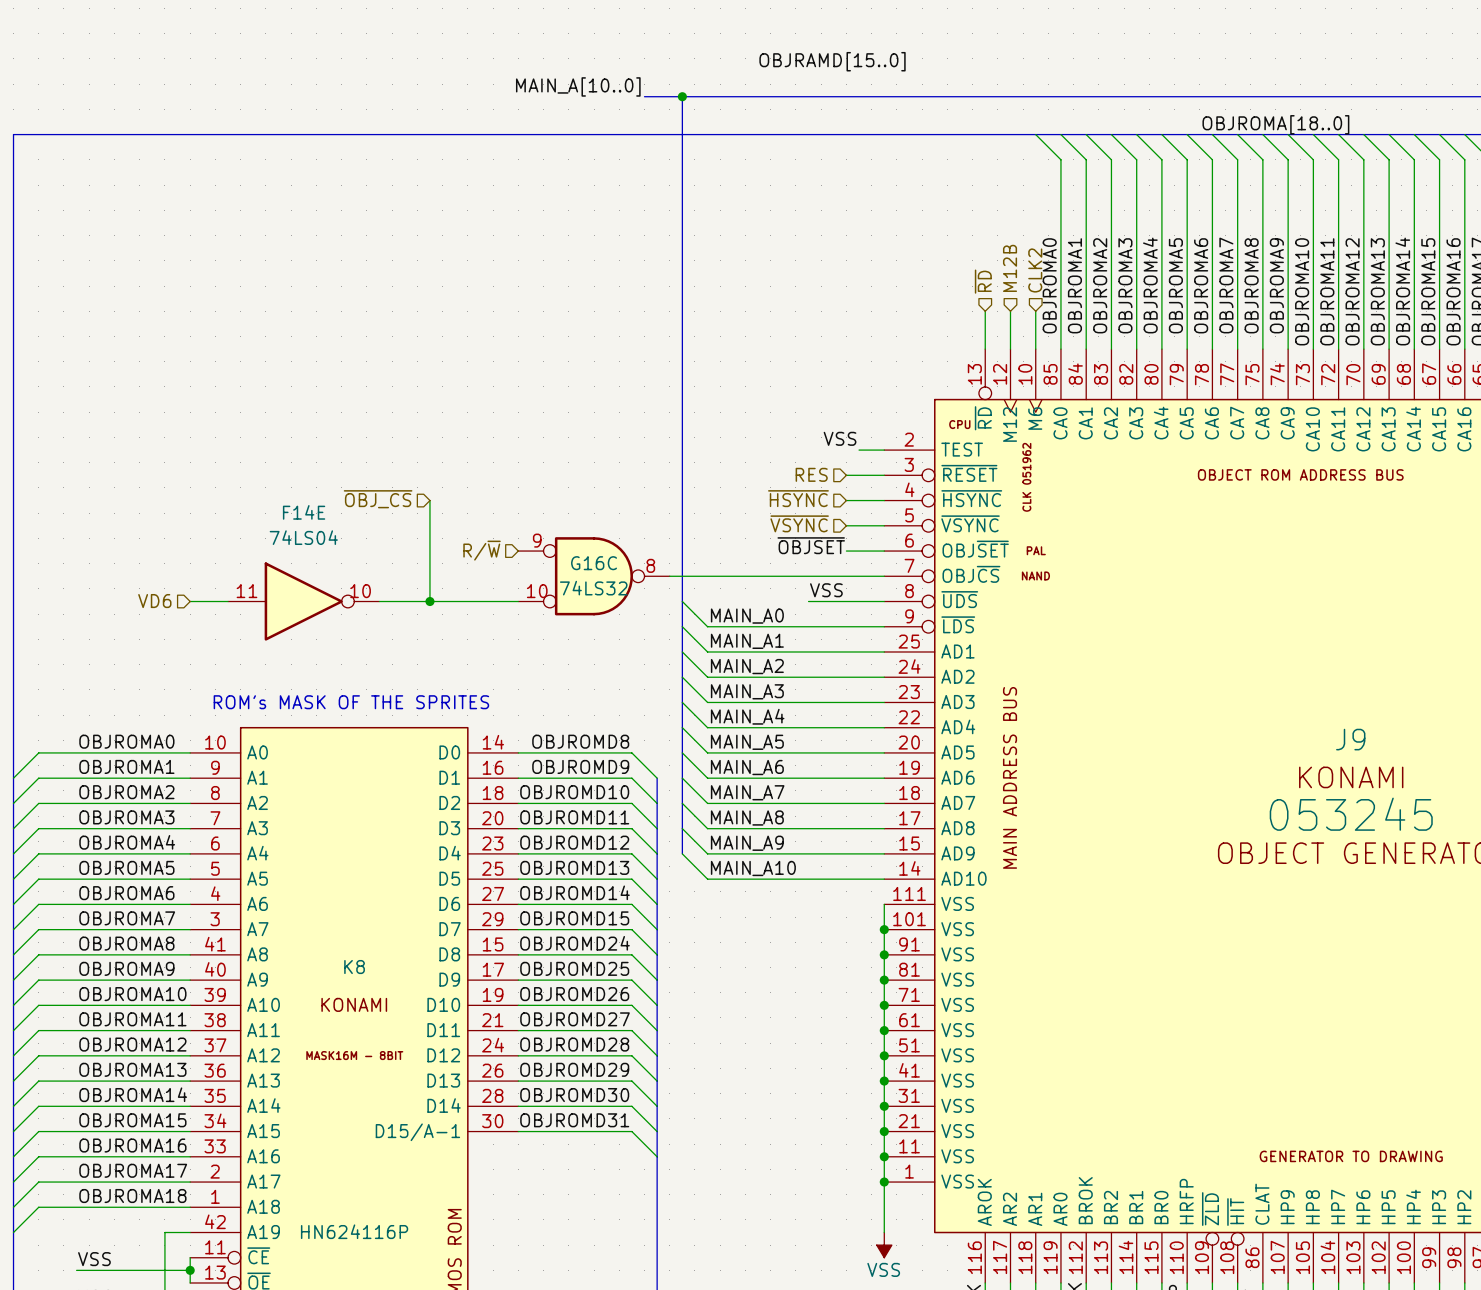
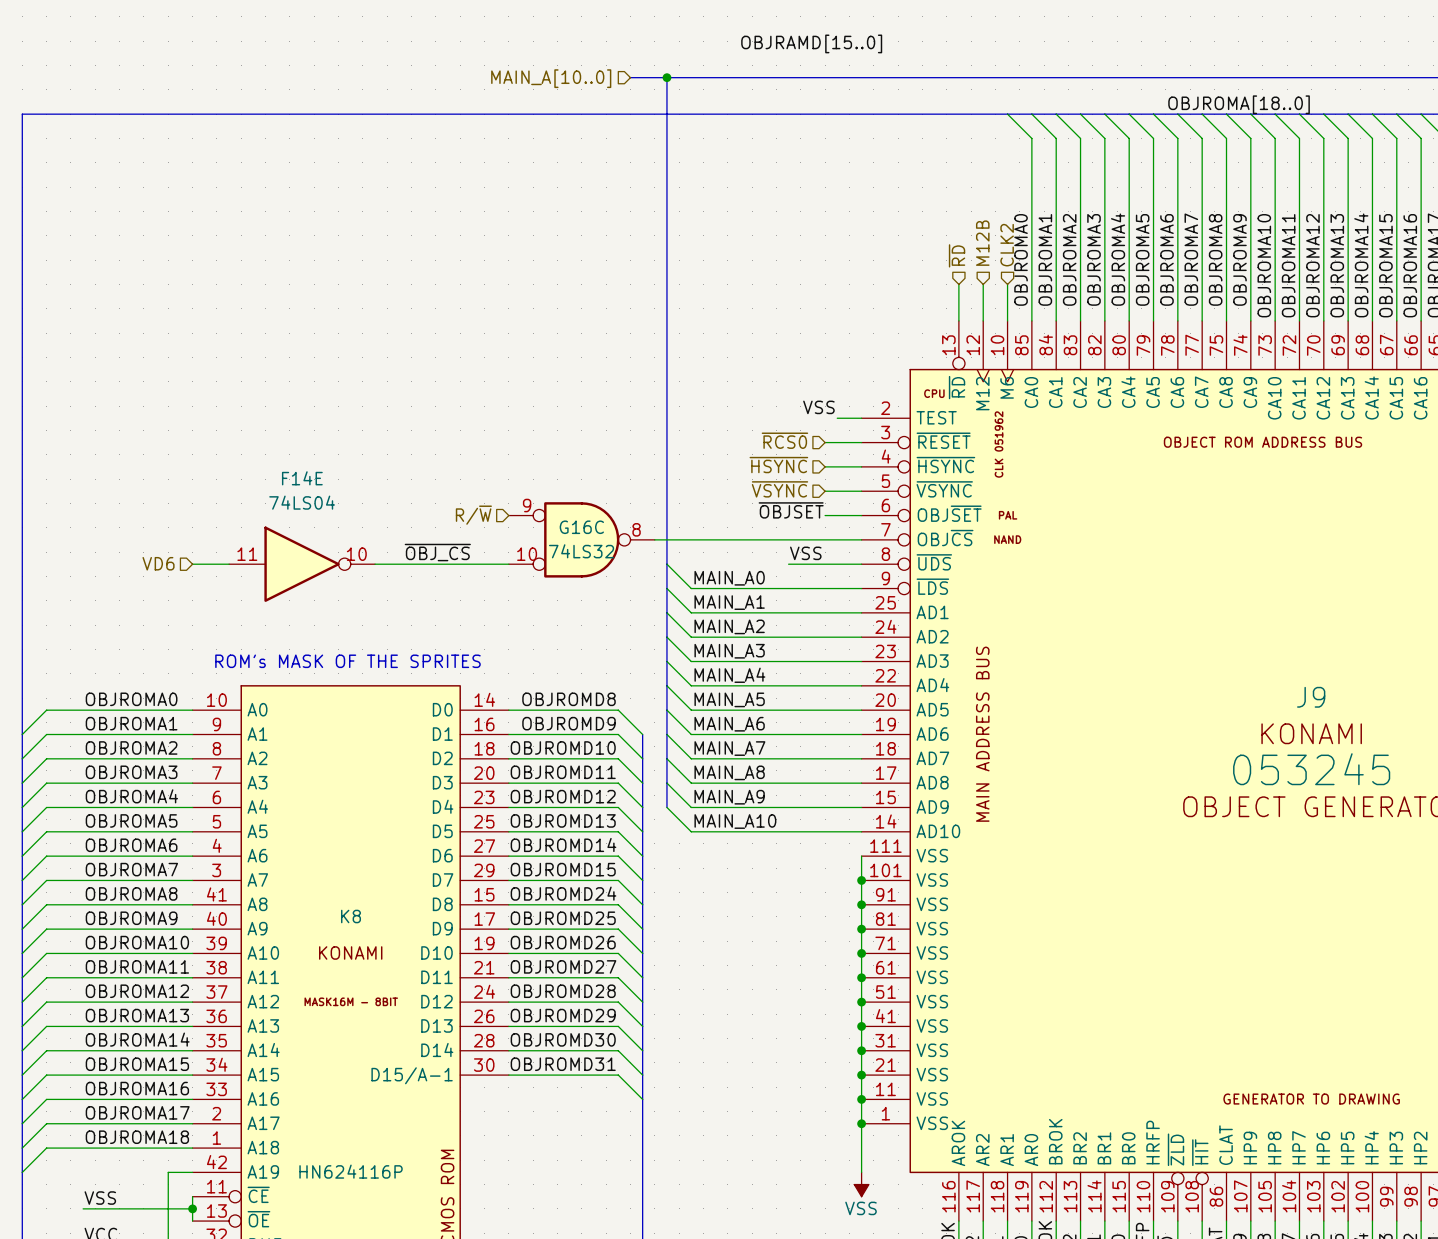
label: MAIN_A[10..0] (578, 86) -> none
hierarchical label: none -> MAIN_A[10..0] (551, 78)
hierarchical label: RES (811, 474) -> ~{RCS0} (784, 440)
hierarchical label: ~{OBJ_CS} (378, 499) -> none
wire: (429, 500) (429, 601) -> none
label: none -> ~{OBJ_CS} (437, 552)
junction: (429, 601) -> none

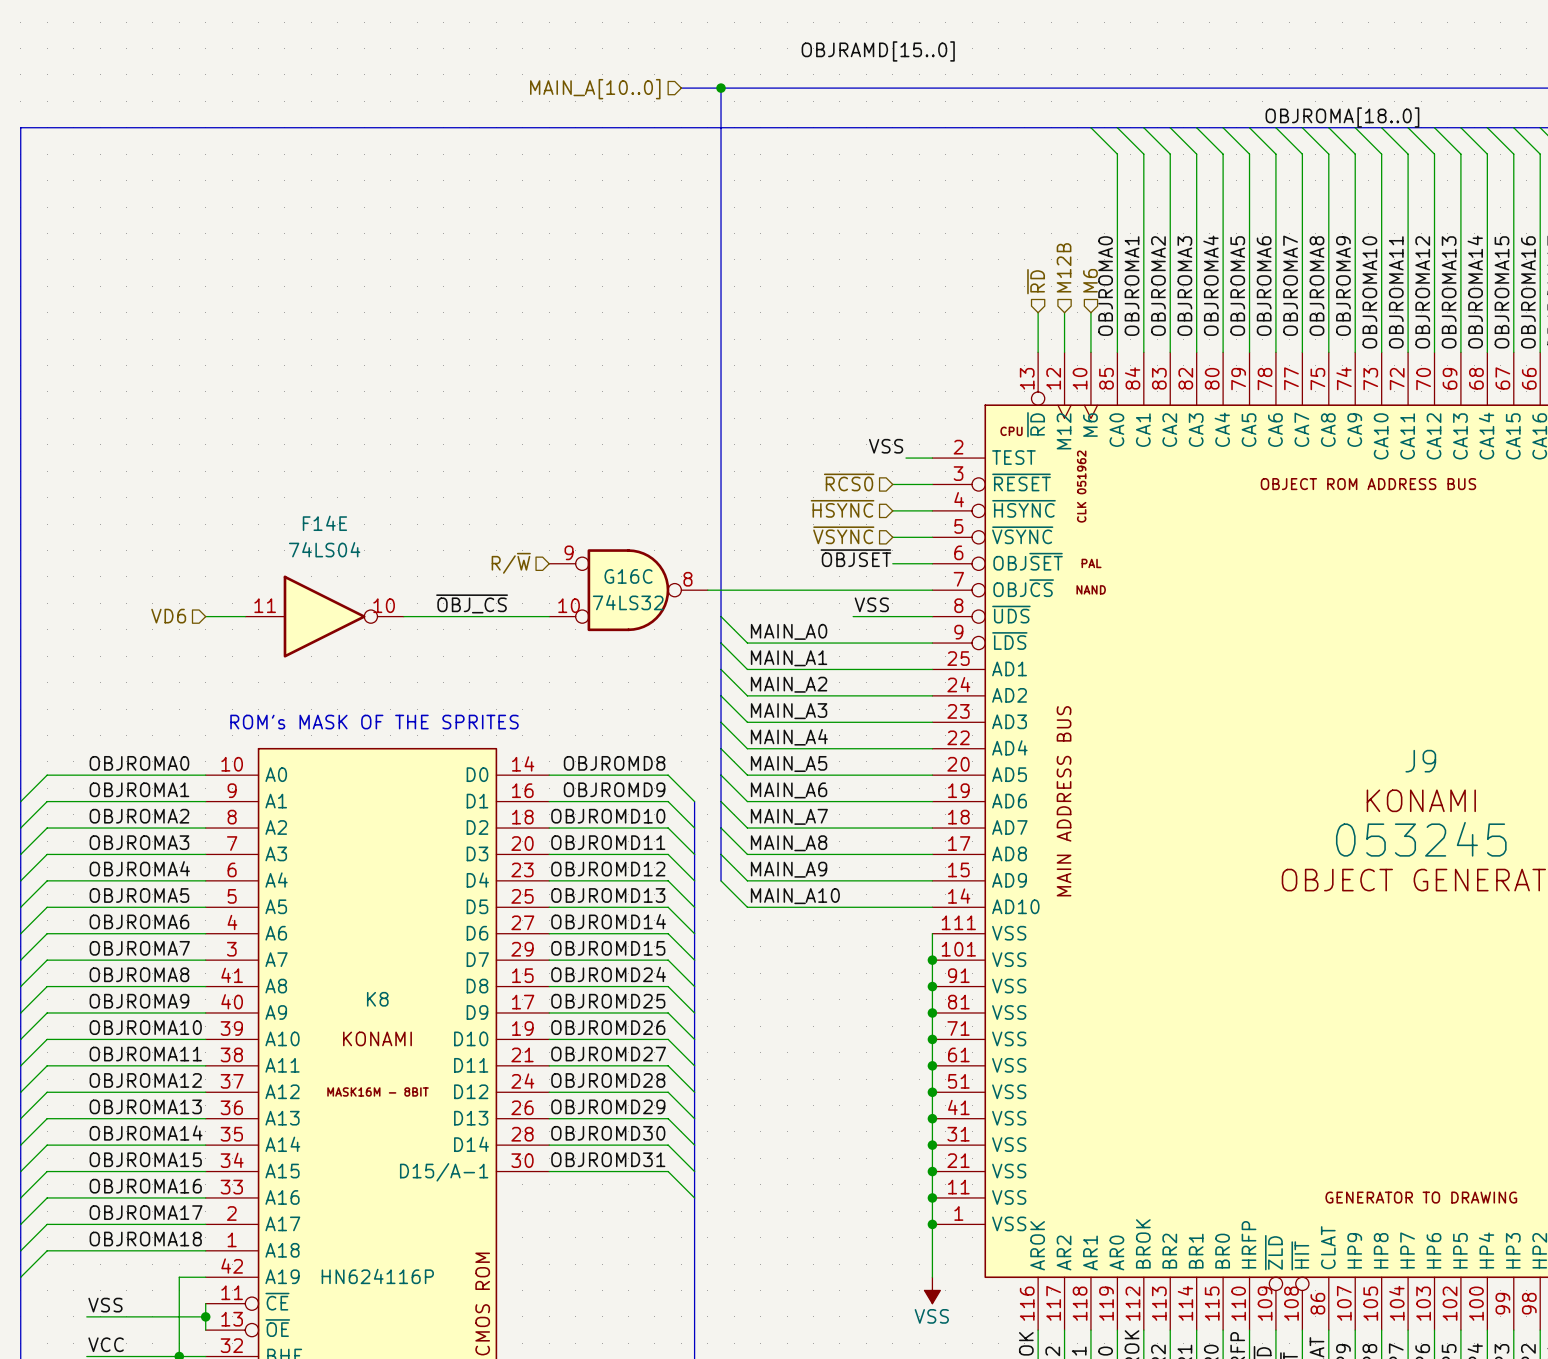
hierarchical label: CLK2 (1007, 245) -> M6 (1090, 280)

